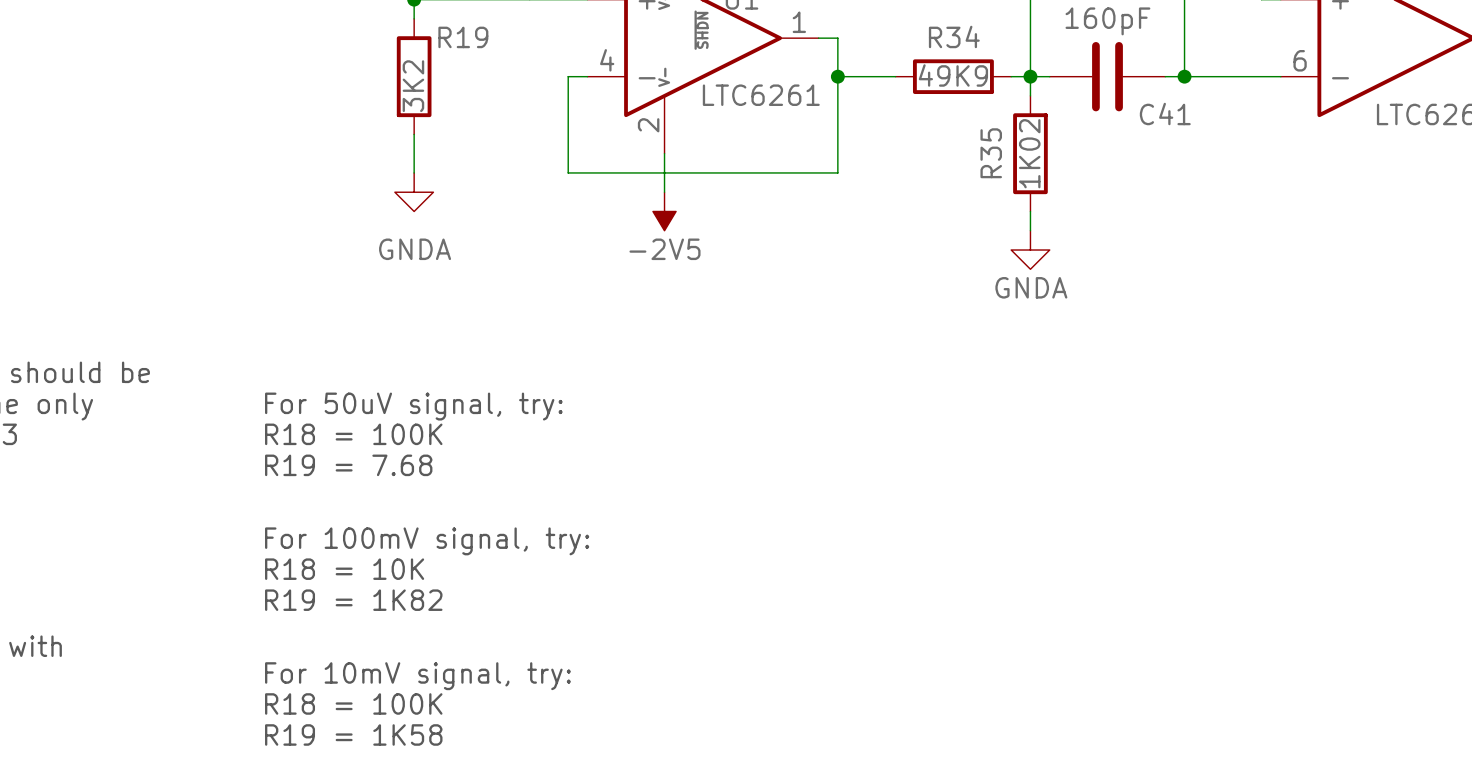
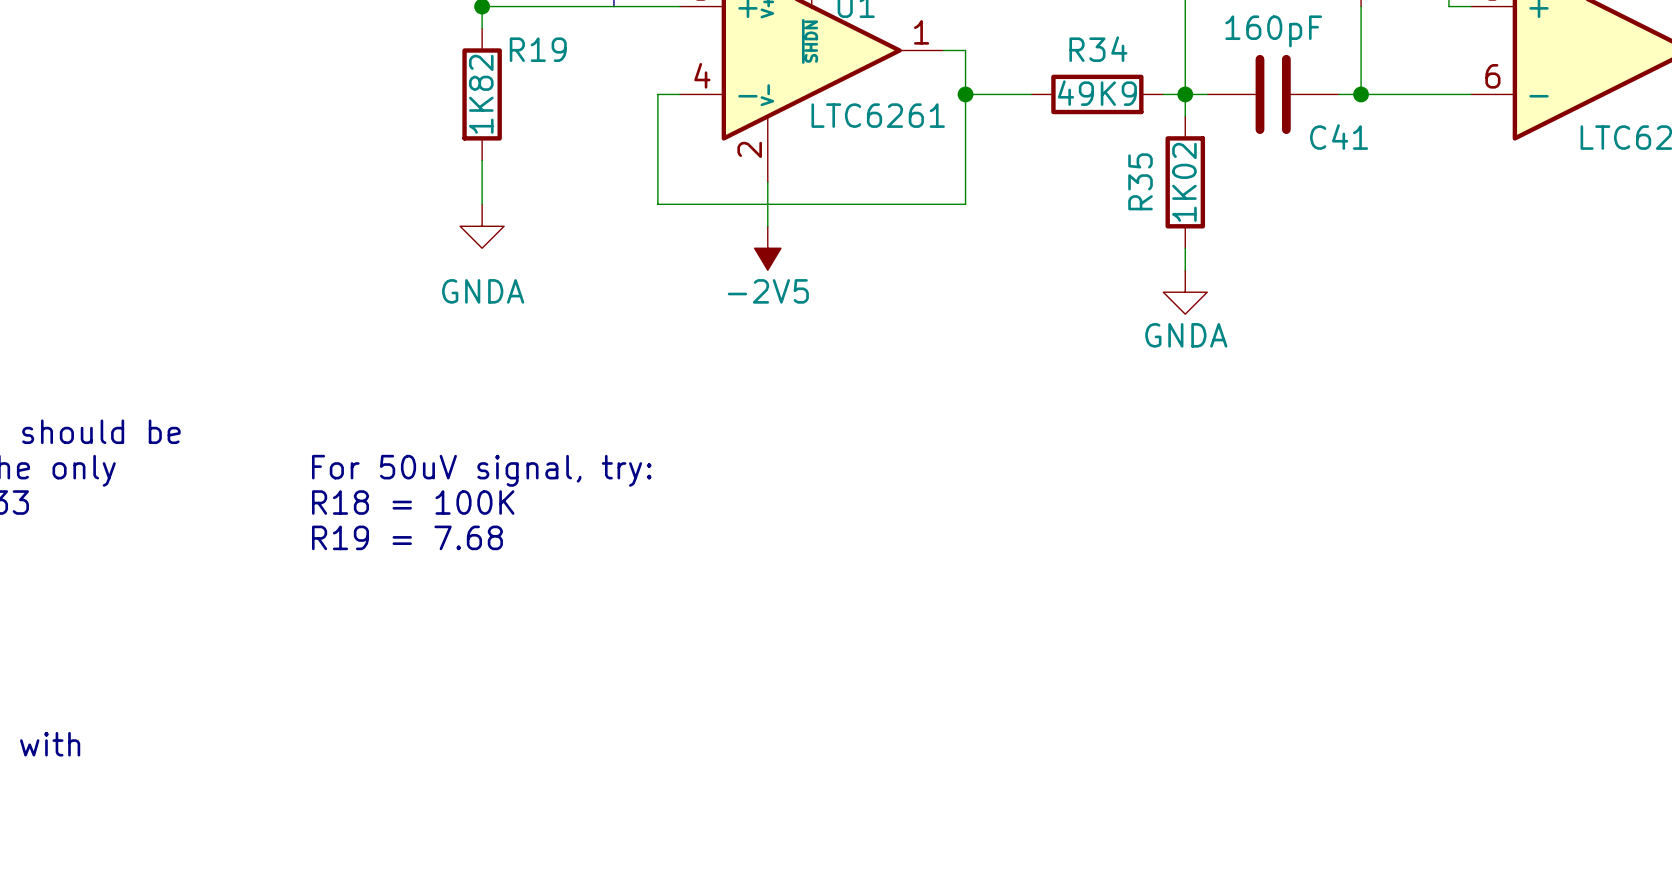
R19 value: 3K2 (413, 86) -> 1K82 (481, 94)
text: For 100mV signal, try: (427, 541) -> none
text: R18 = 10K (344, 569) -> none
text: R19 = 1K82 (353, 600) -> none
text: For 10mV signal, try: (417, 676) -> none
text: R18 = 100K (353, 703) -> none
text: R19 = 1K58 (353, 734) -> none

